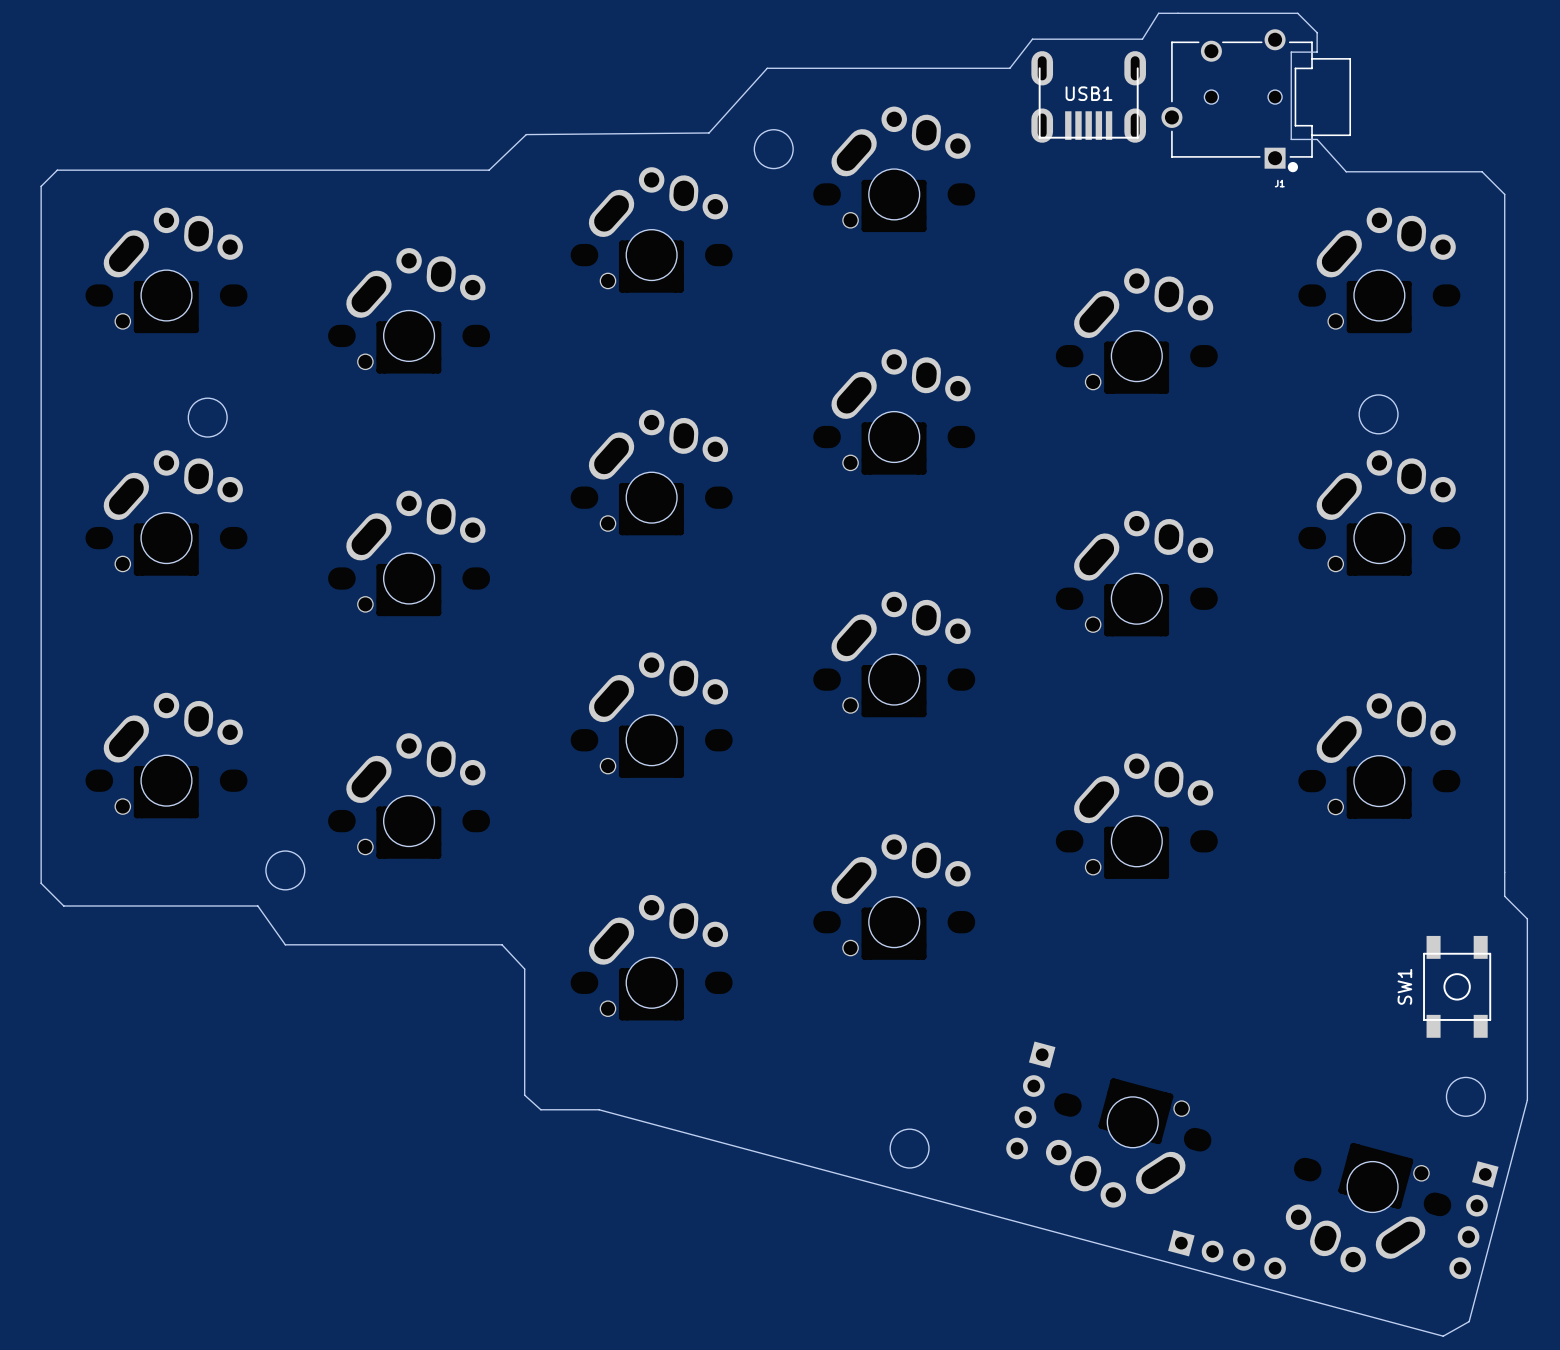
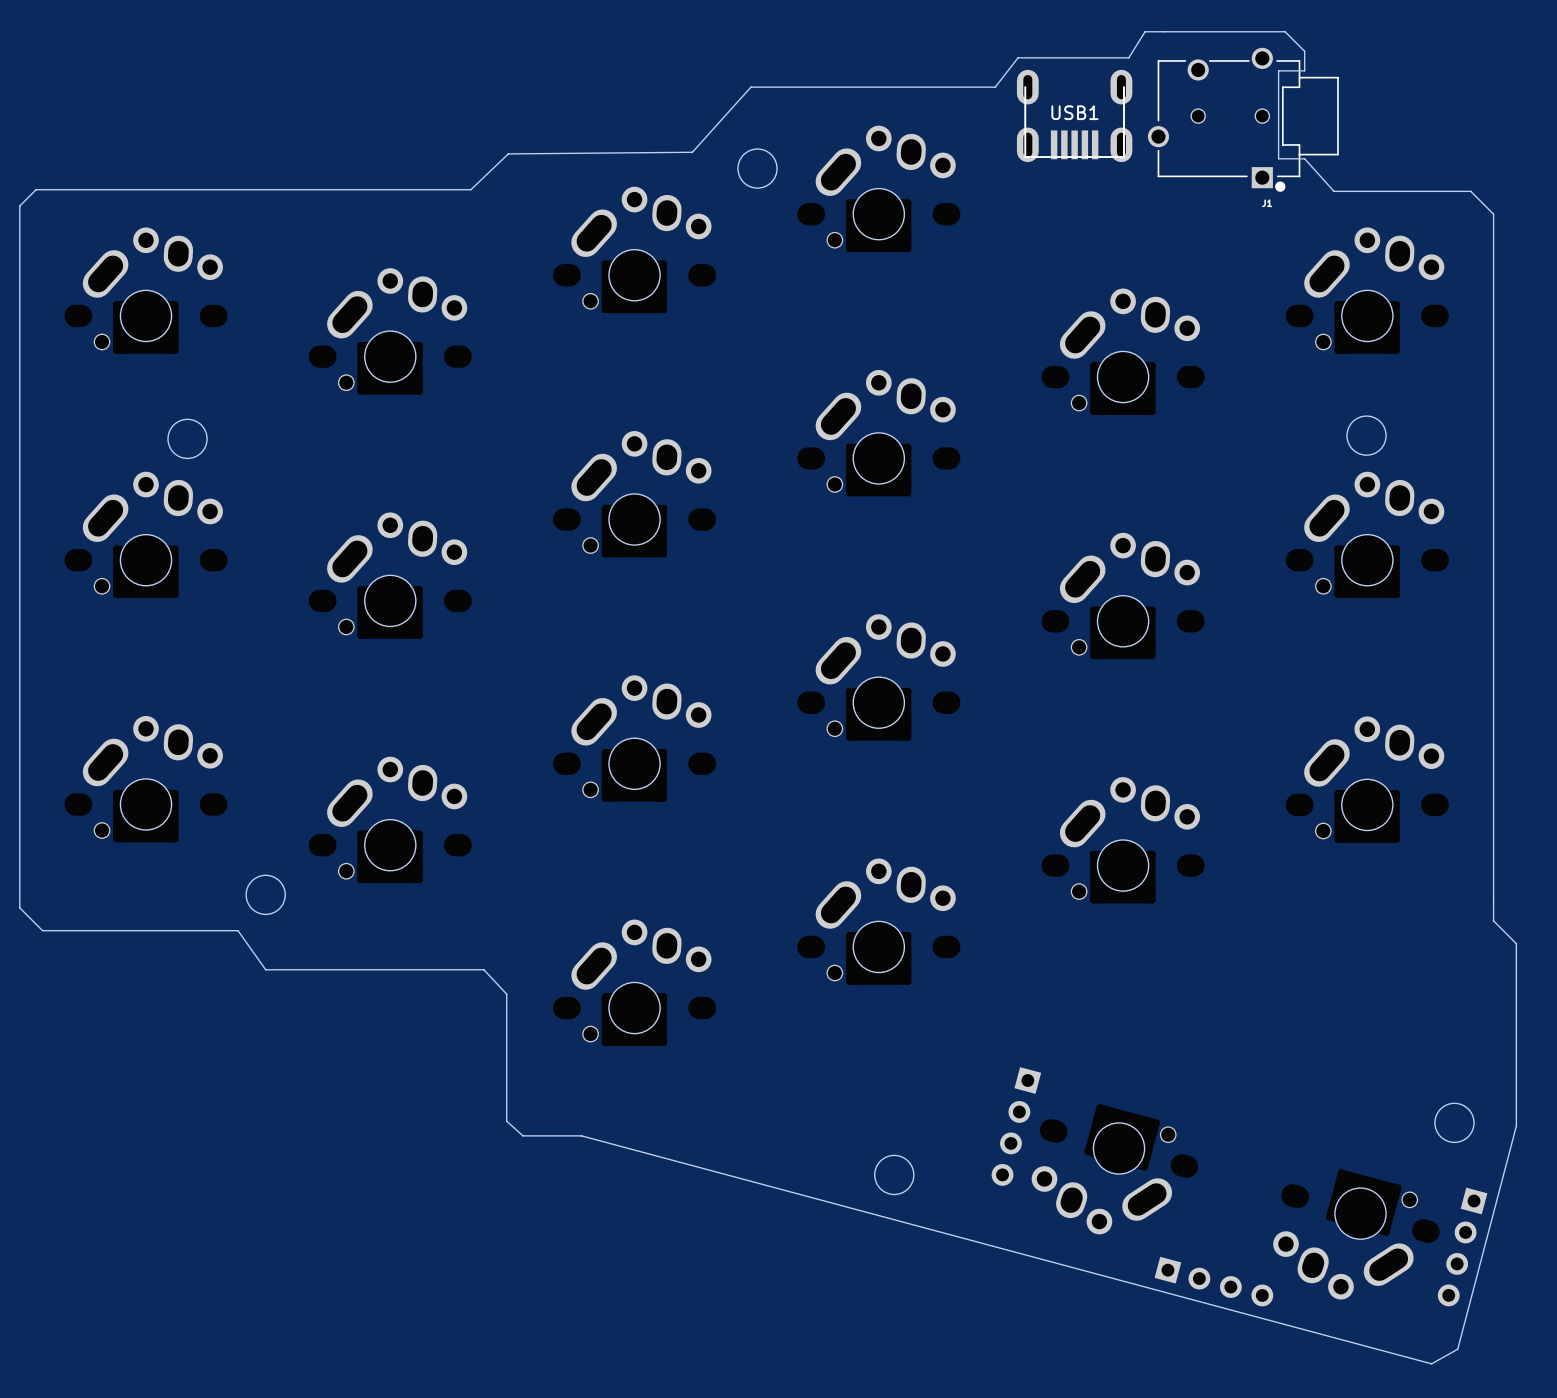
SW1: (1457, 986) -> none

